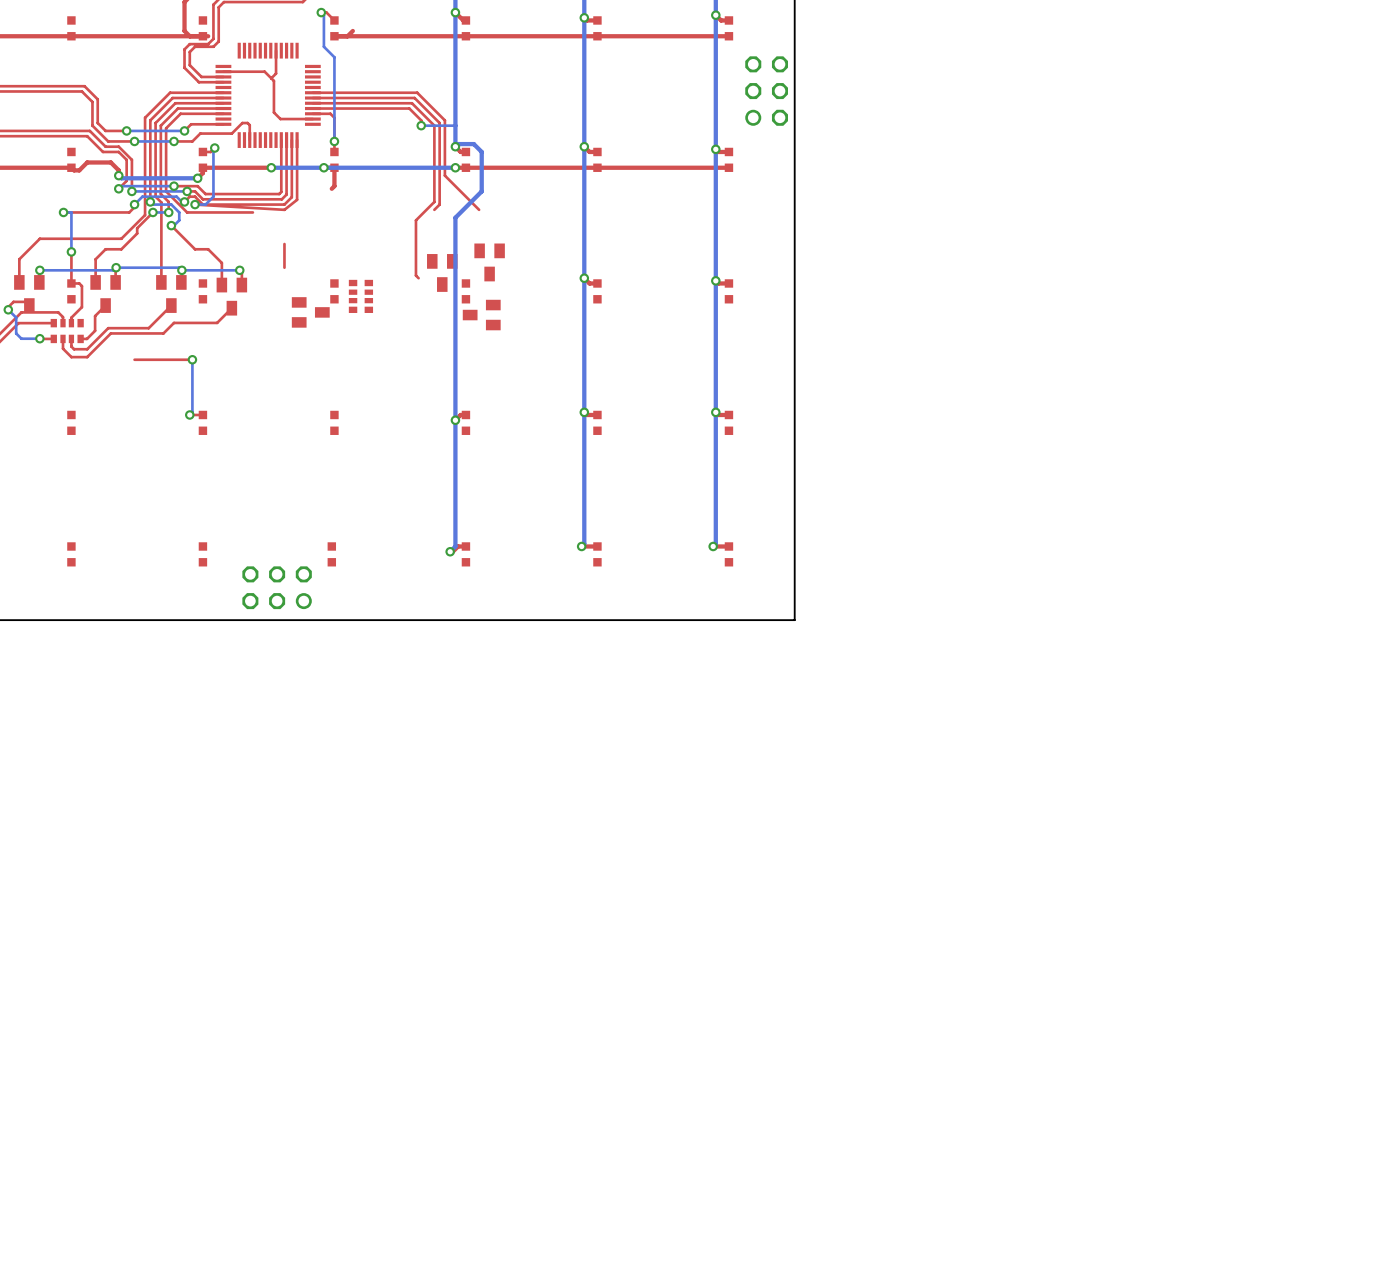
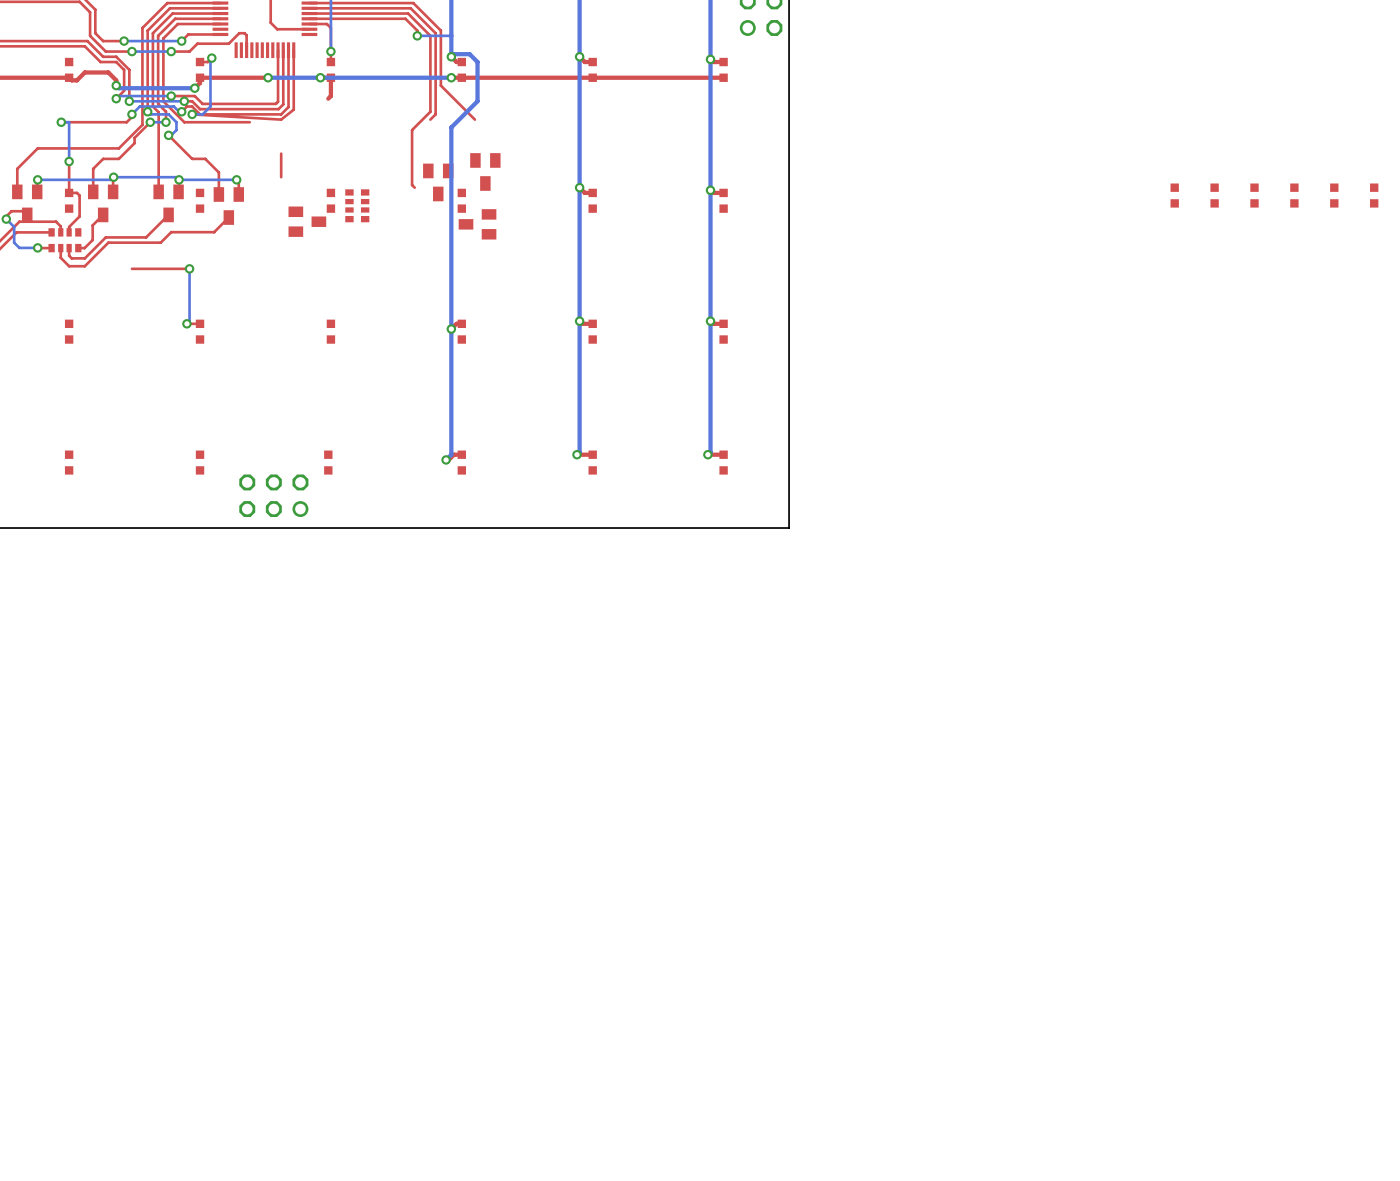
part: none -> (1174, 195)
part: none -> (1214, 195)
part: none -> (1254, 195)
part: none -> (1294, 195)
part: none -> (1334, 195)
part: none -> (1374, 195)

